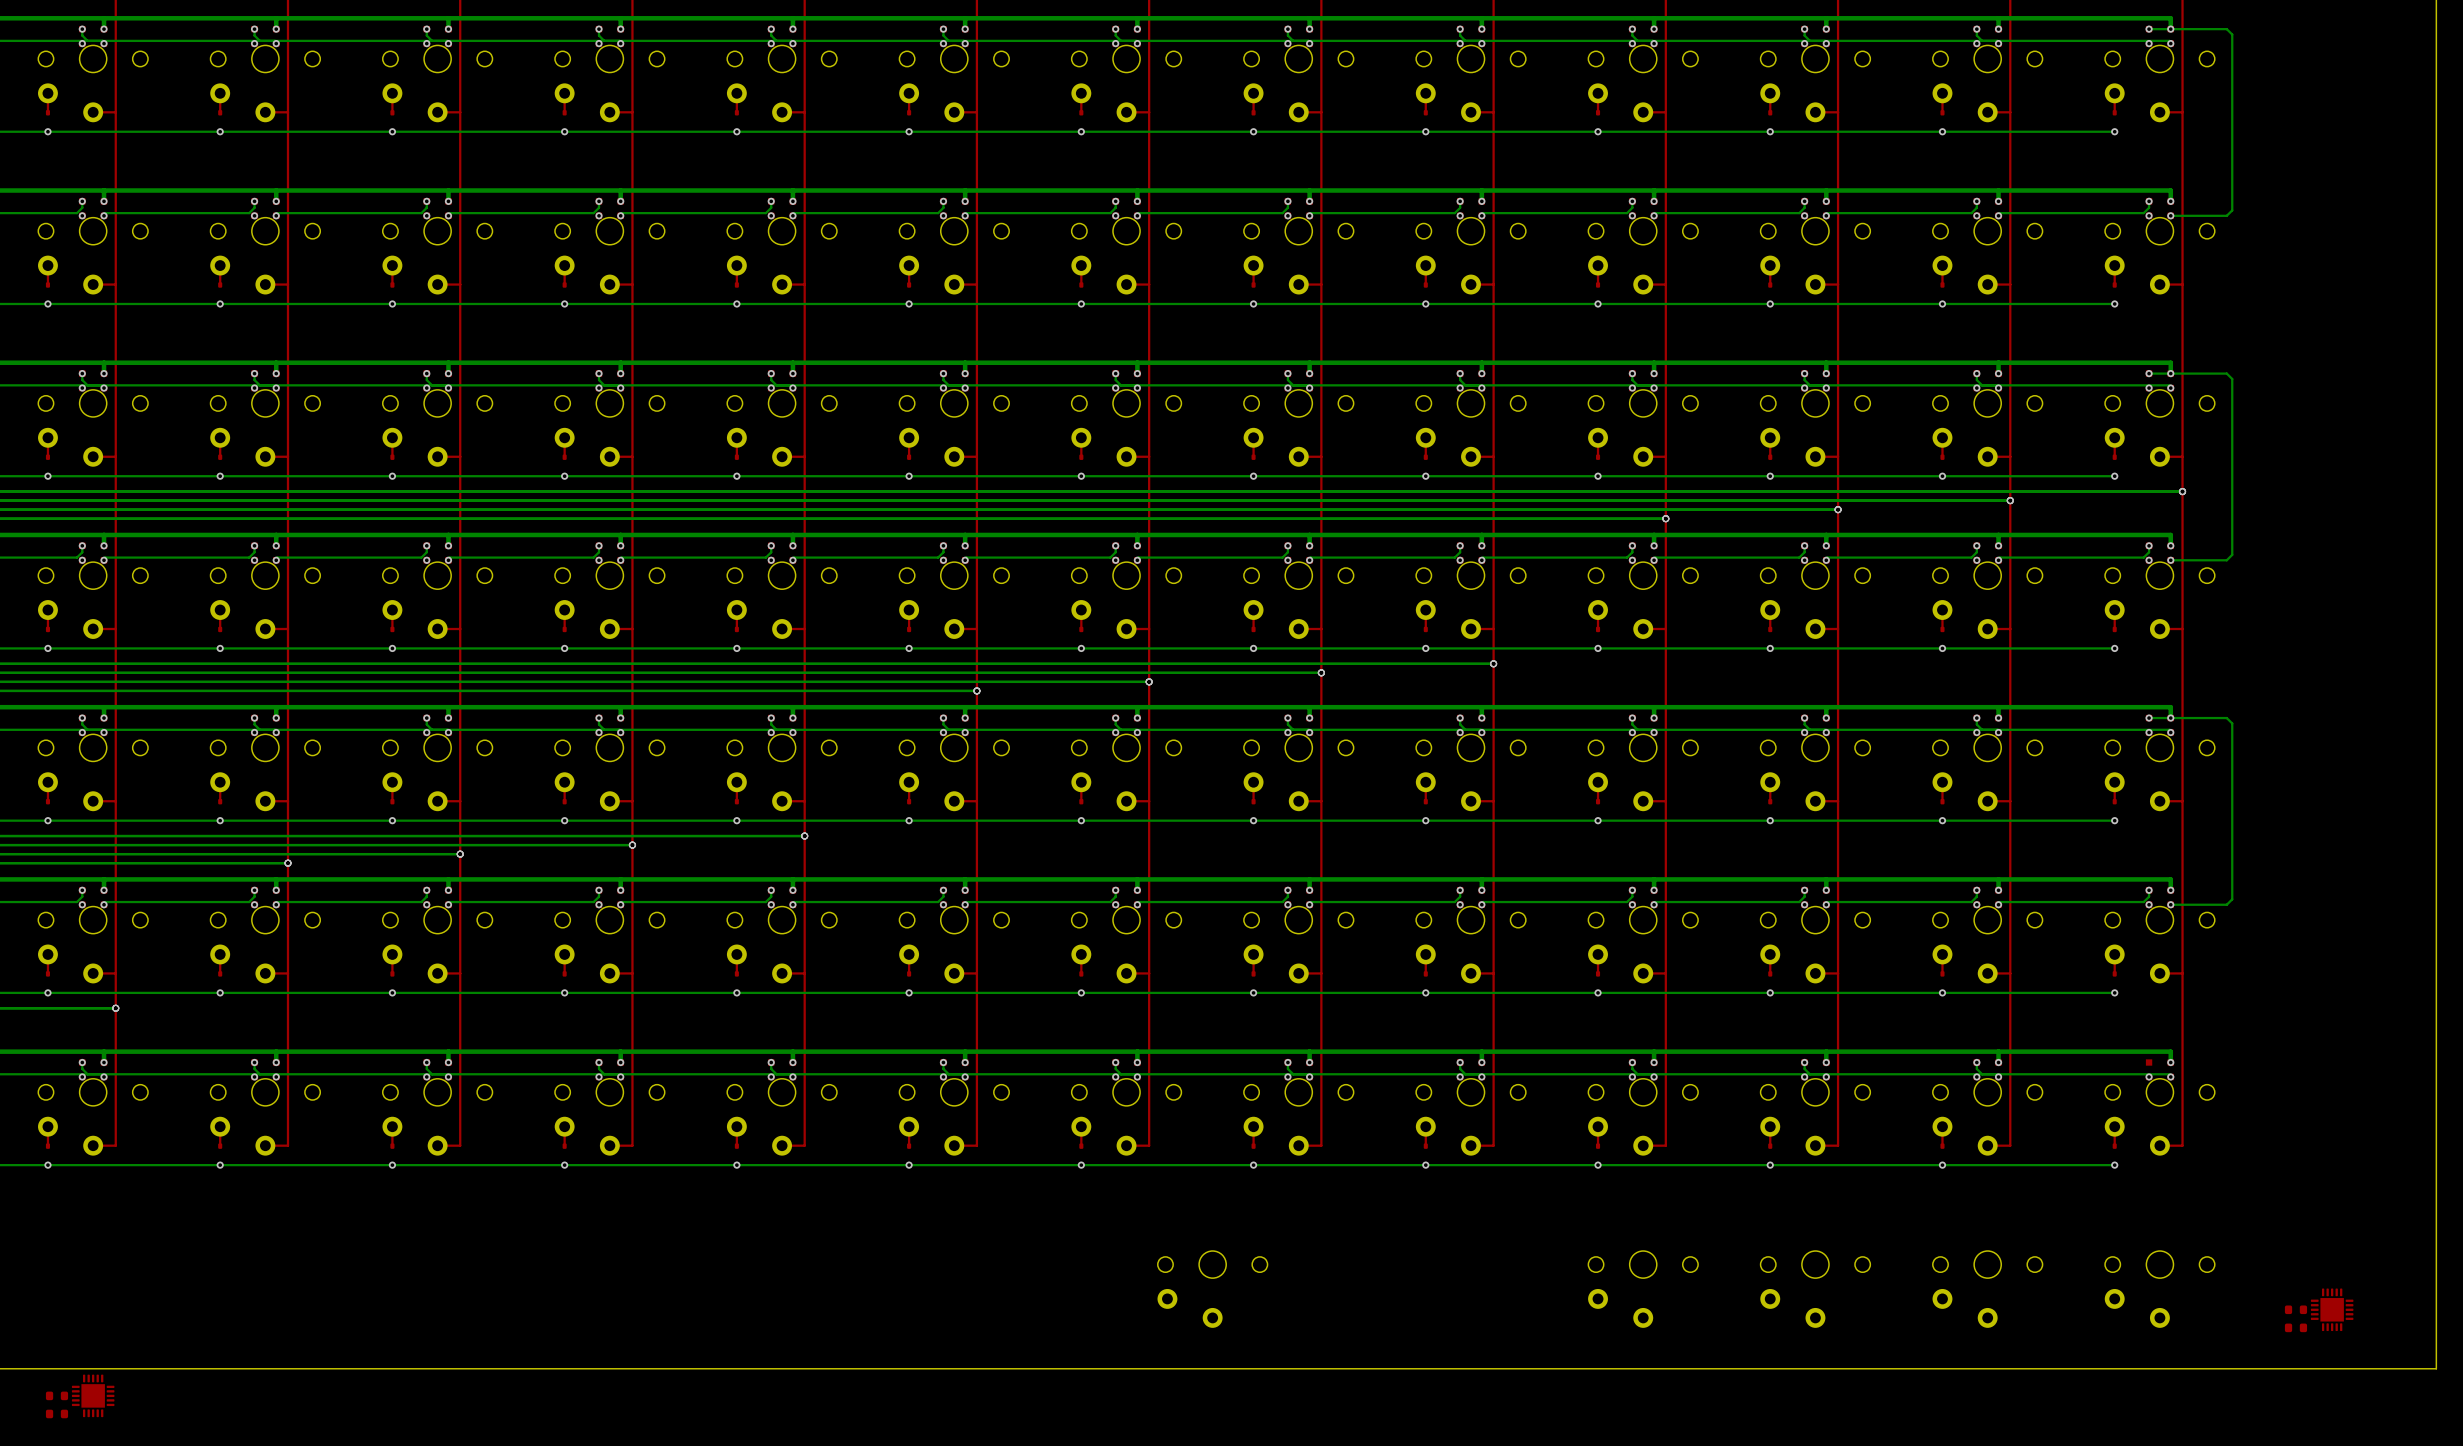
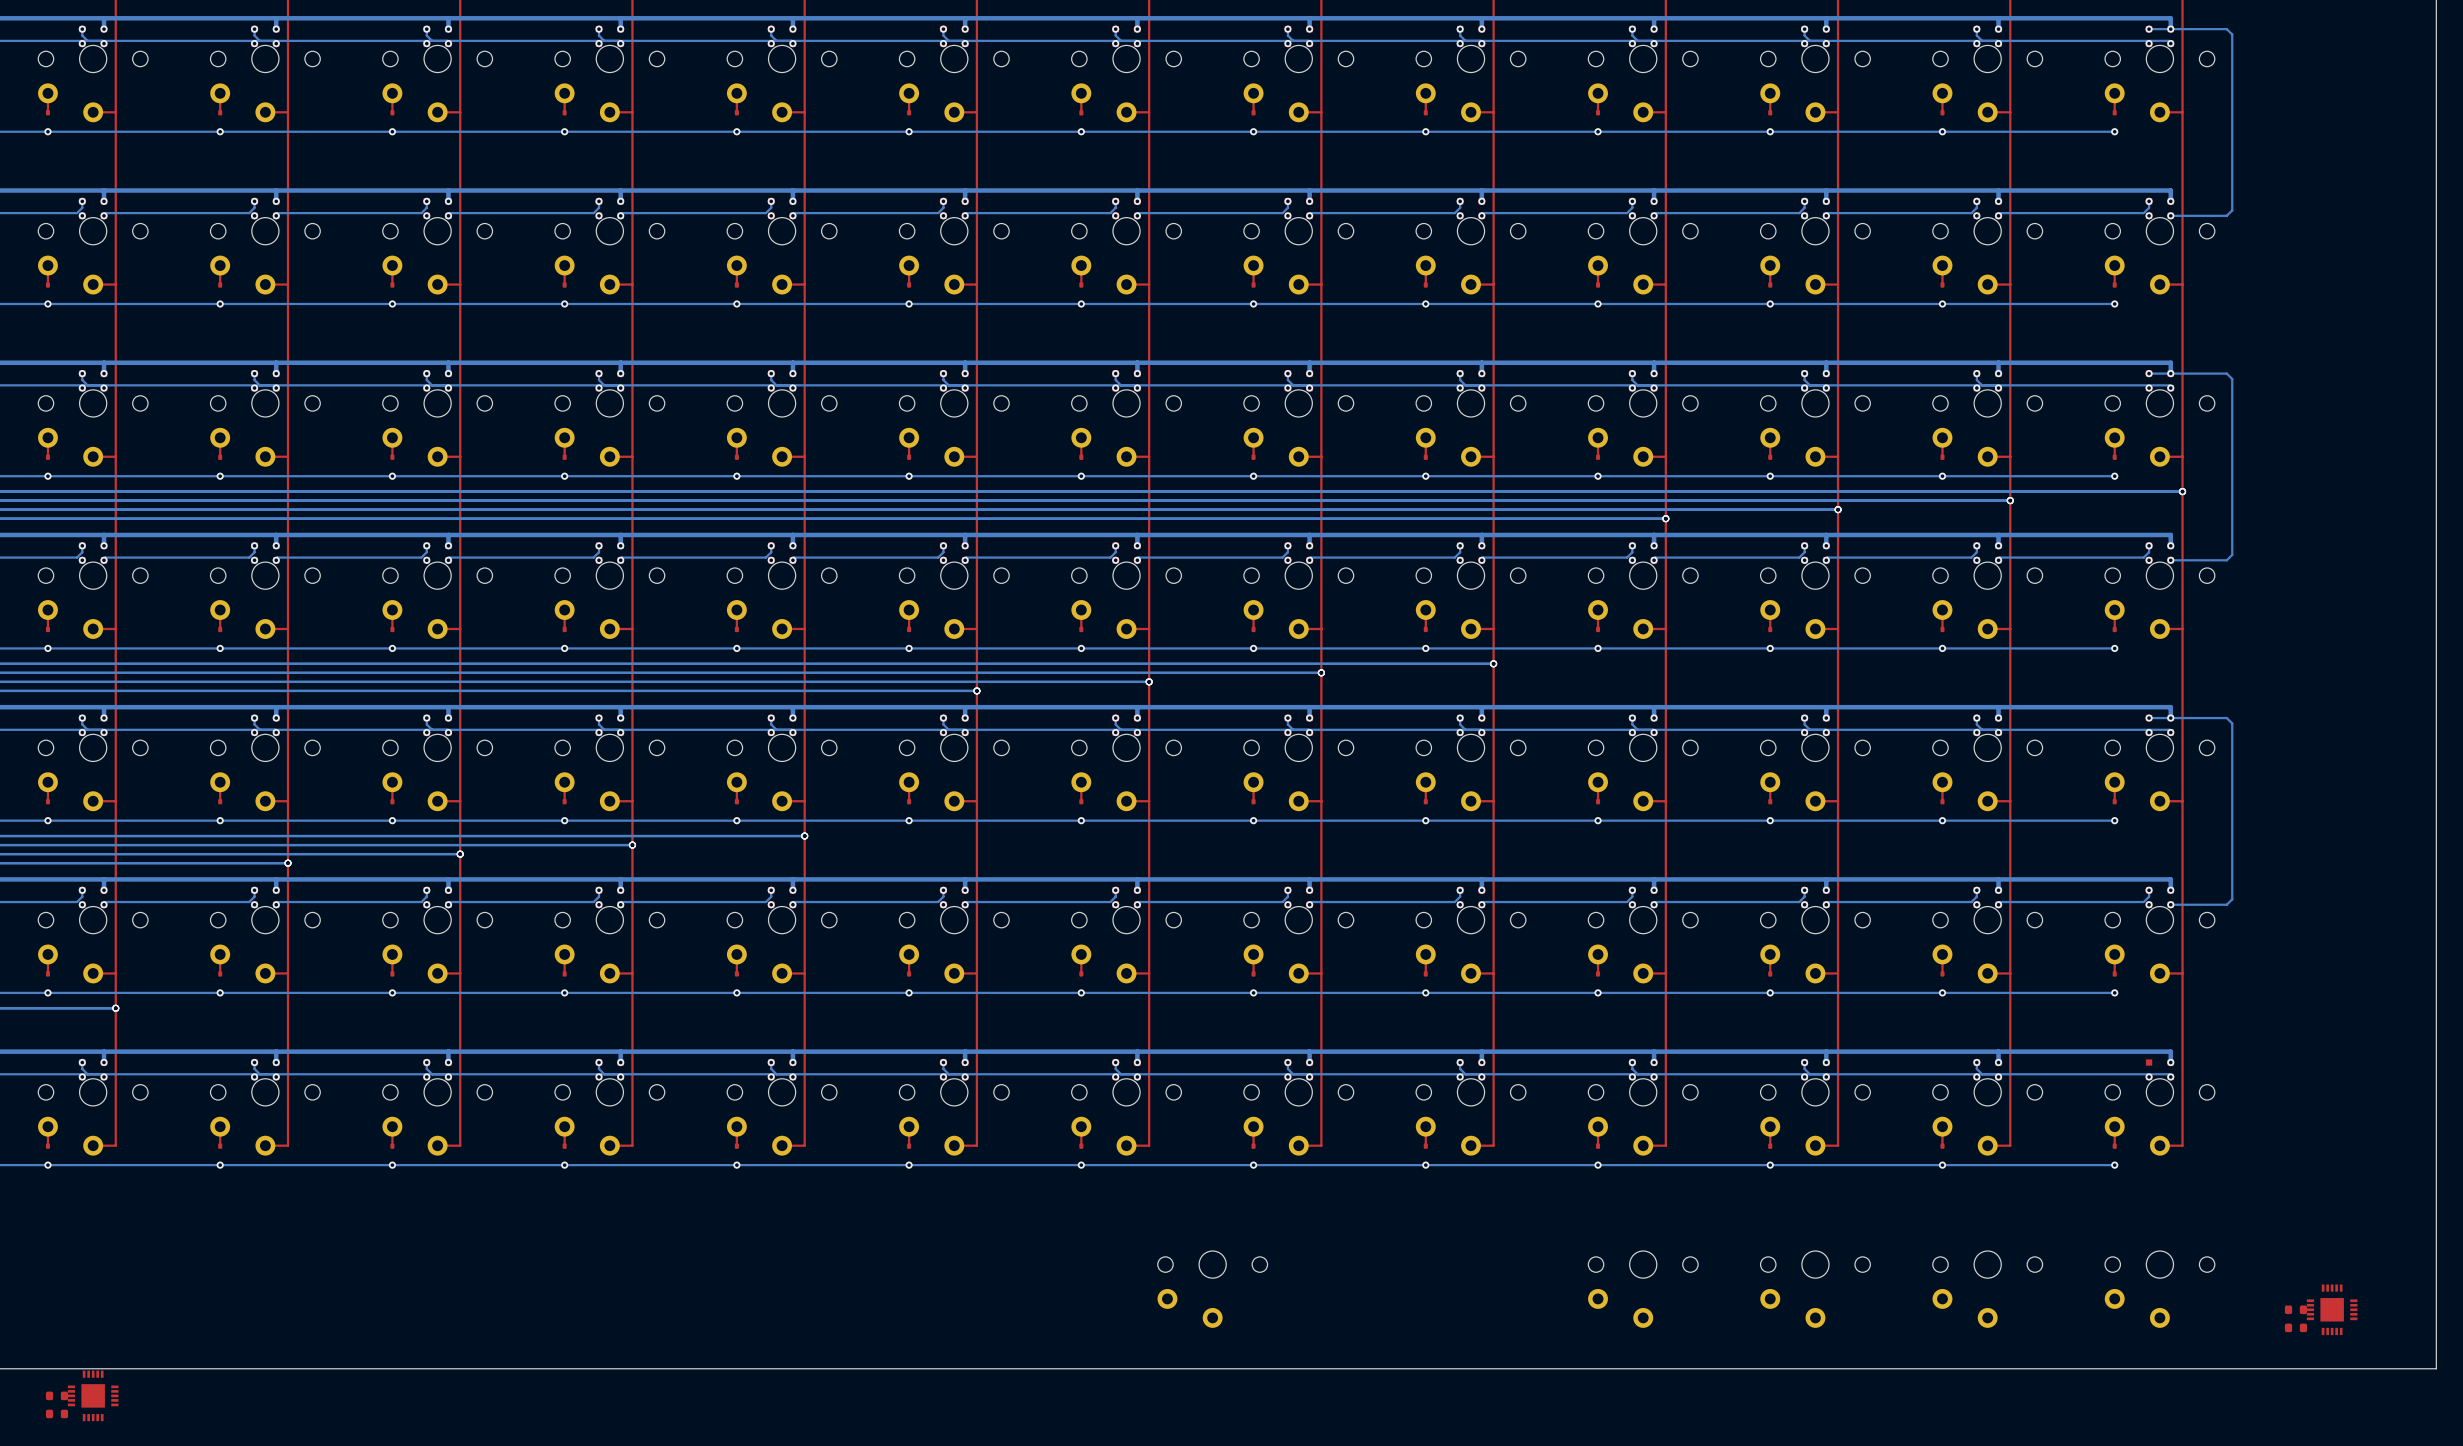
part footprint: [2310, 1288, 2354, 1332] -> [2306, 1284, 2358, 1336]
part footprint: [71, 1374, 115, 1418] -> [67, 1370, 119, 1422]

